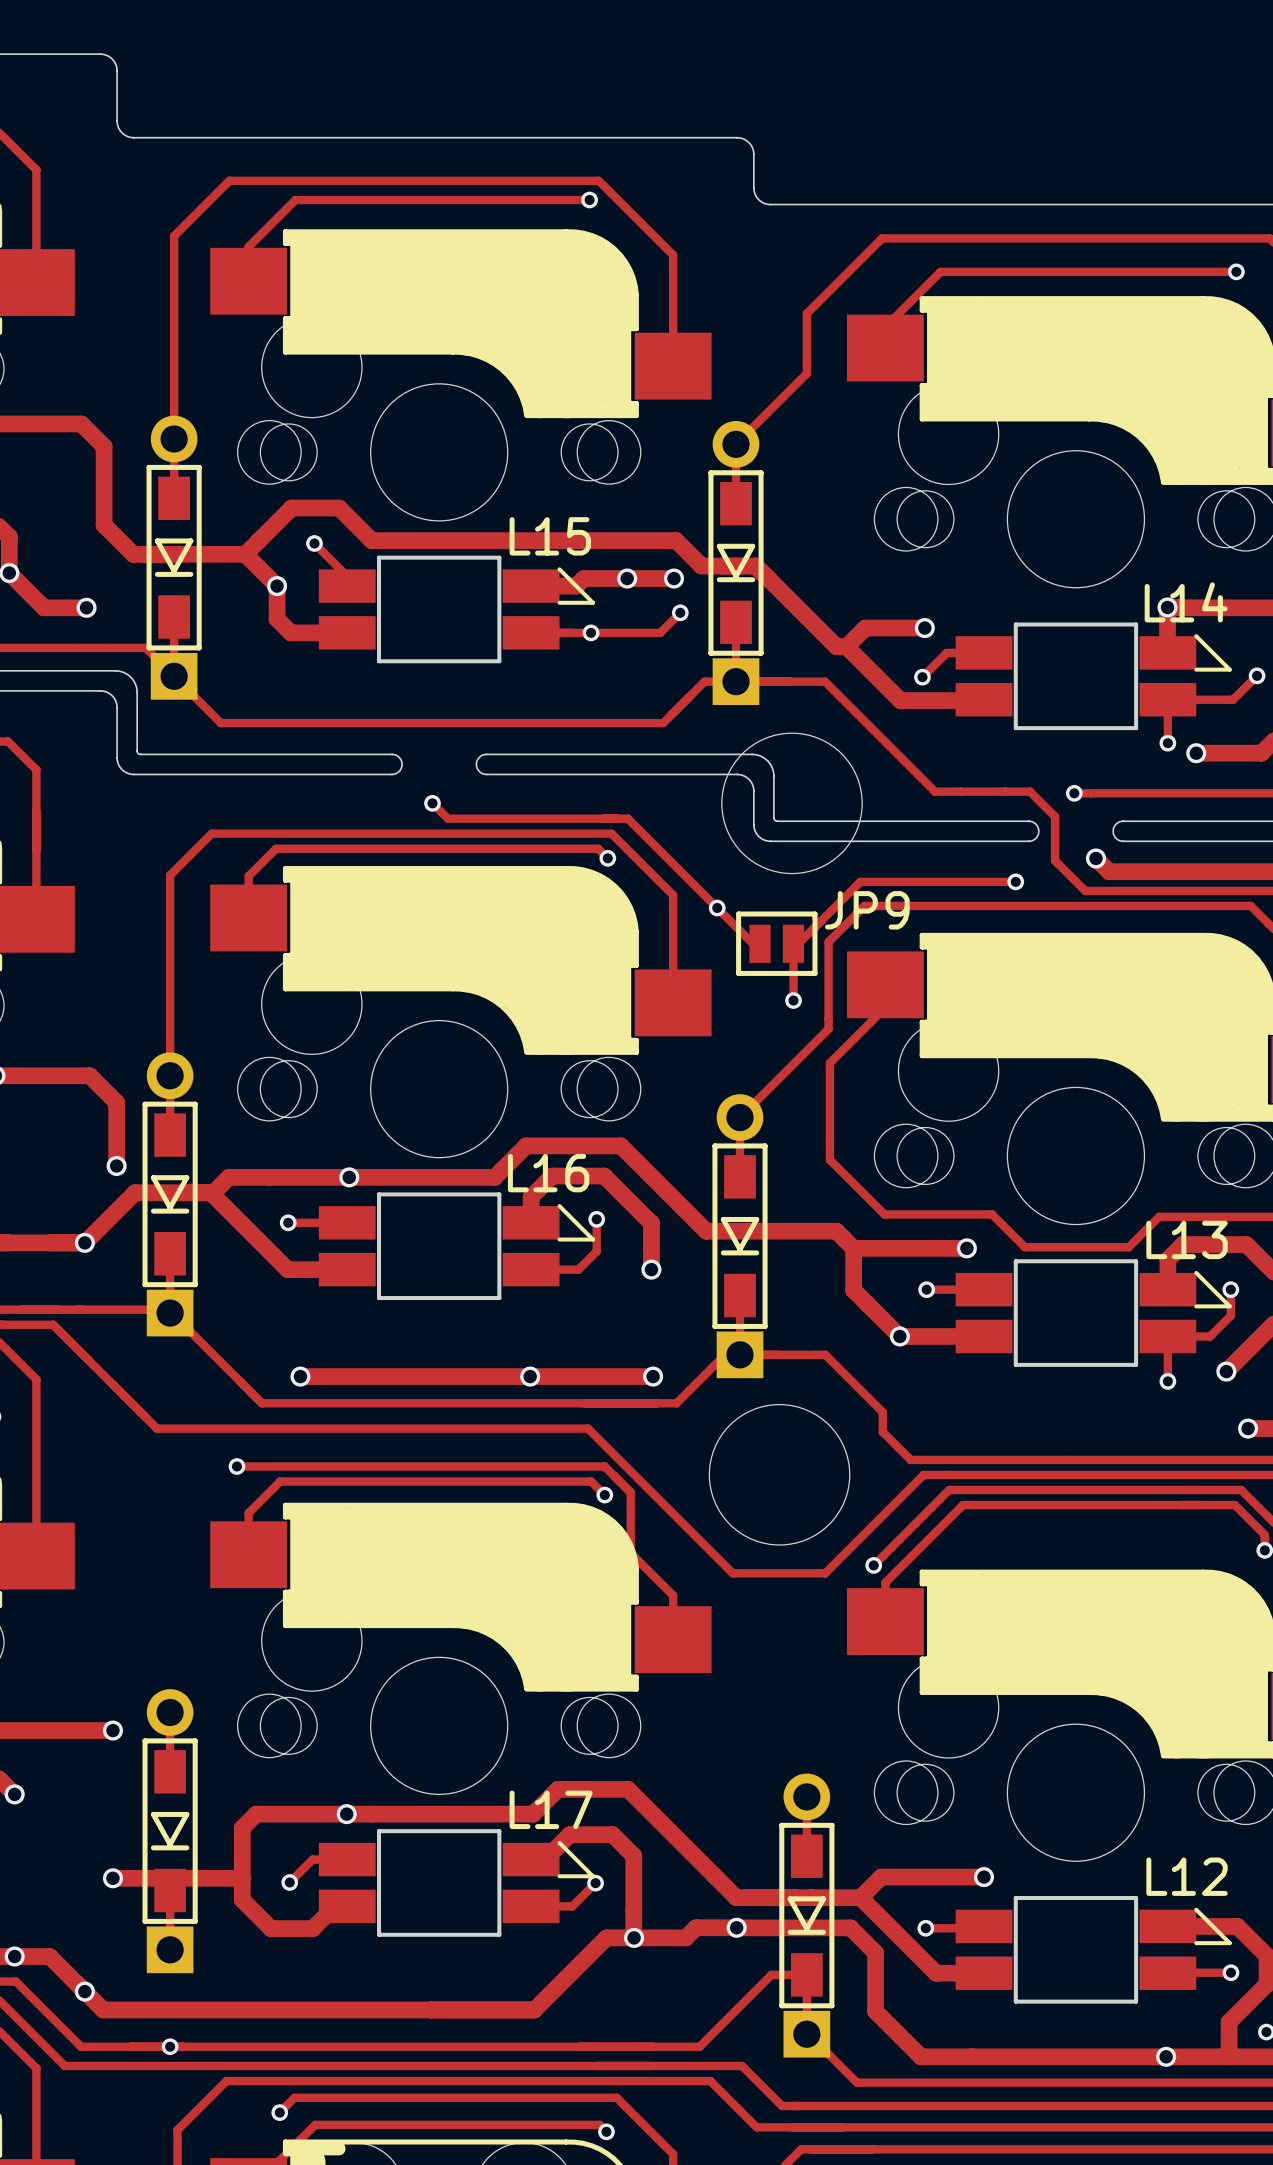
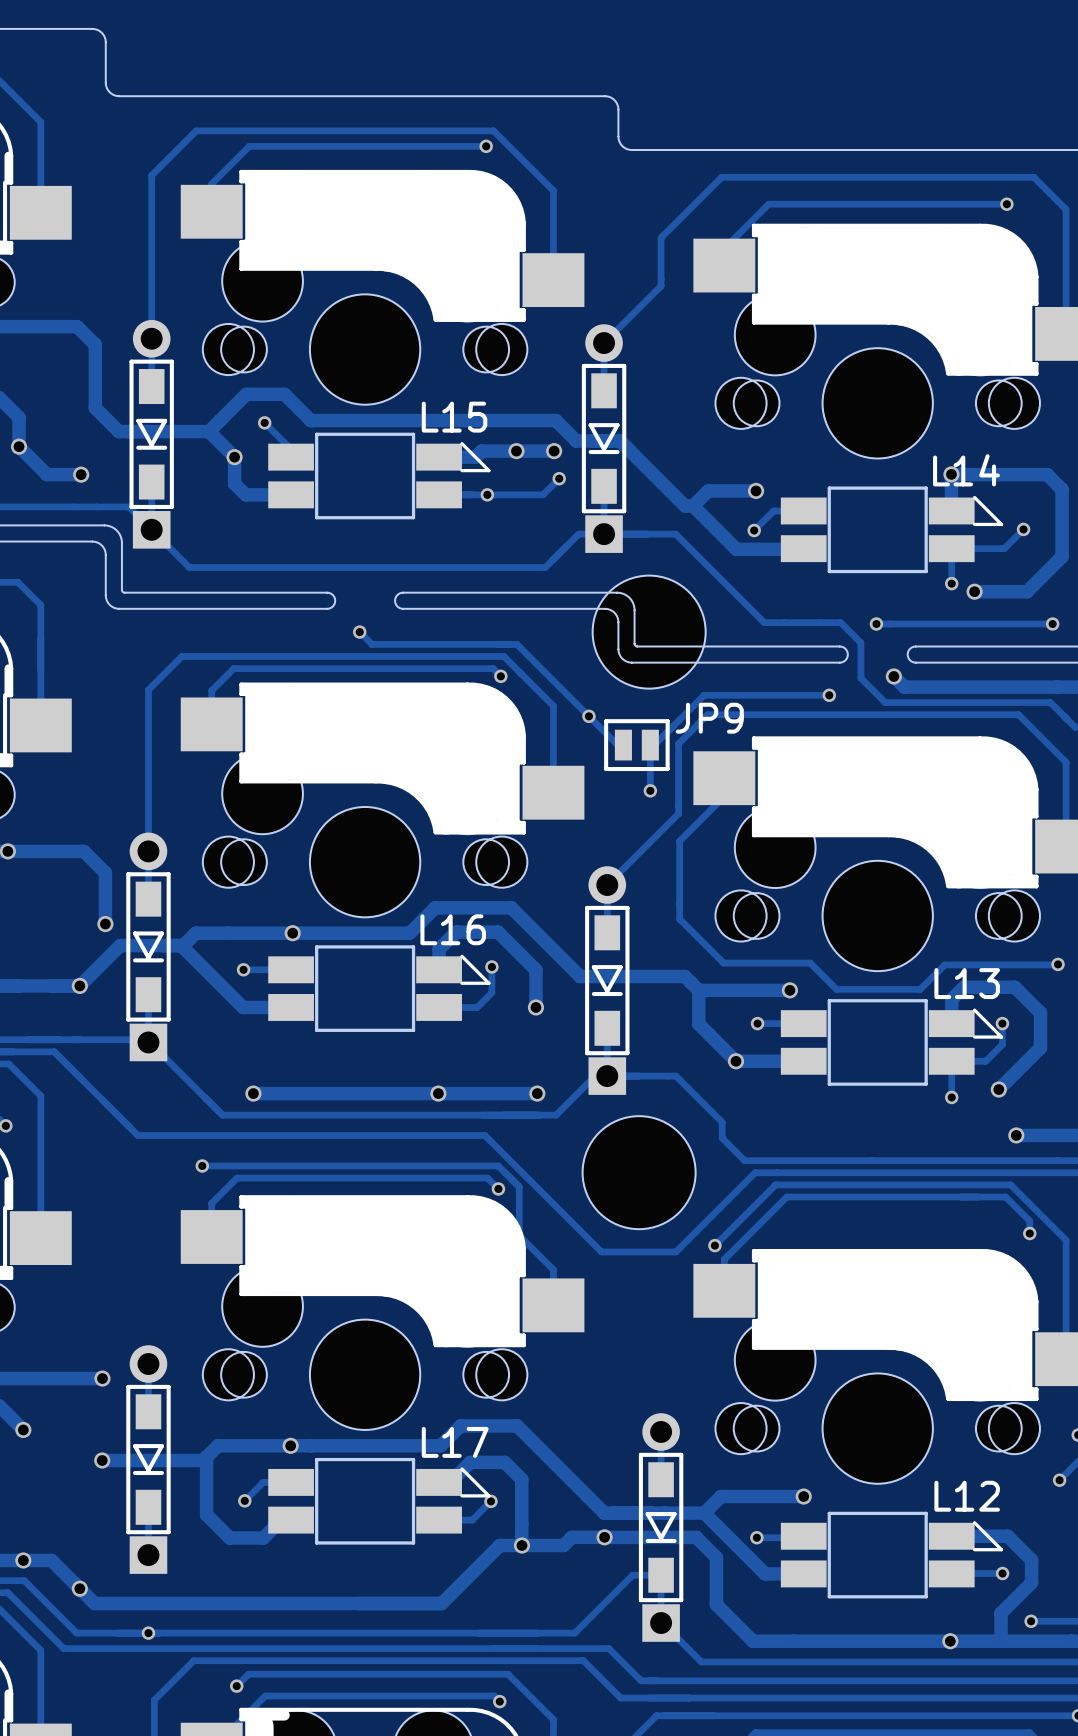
track: none -> (206, 1457) (203, 1460) (102, 1460)
track: (112, 1878) (242, 1878) -> none
via position: (112, 1878) -> (102, 1460)

